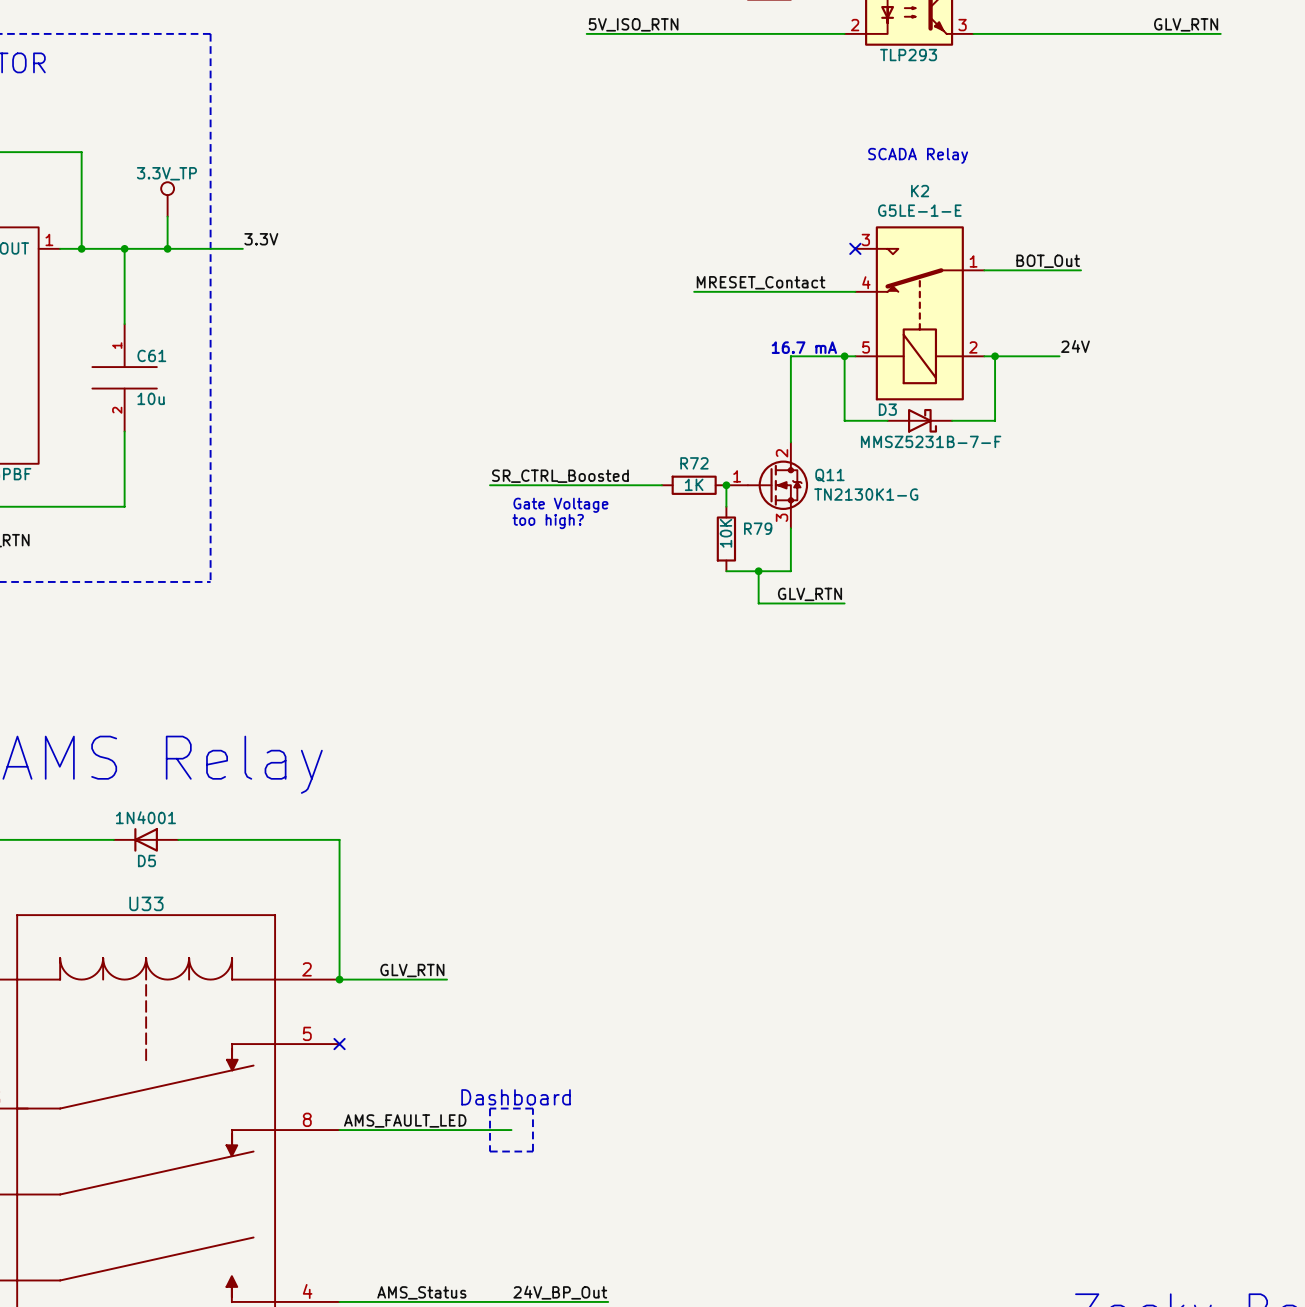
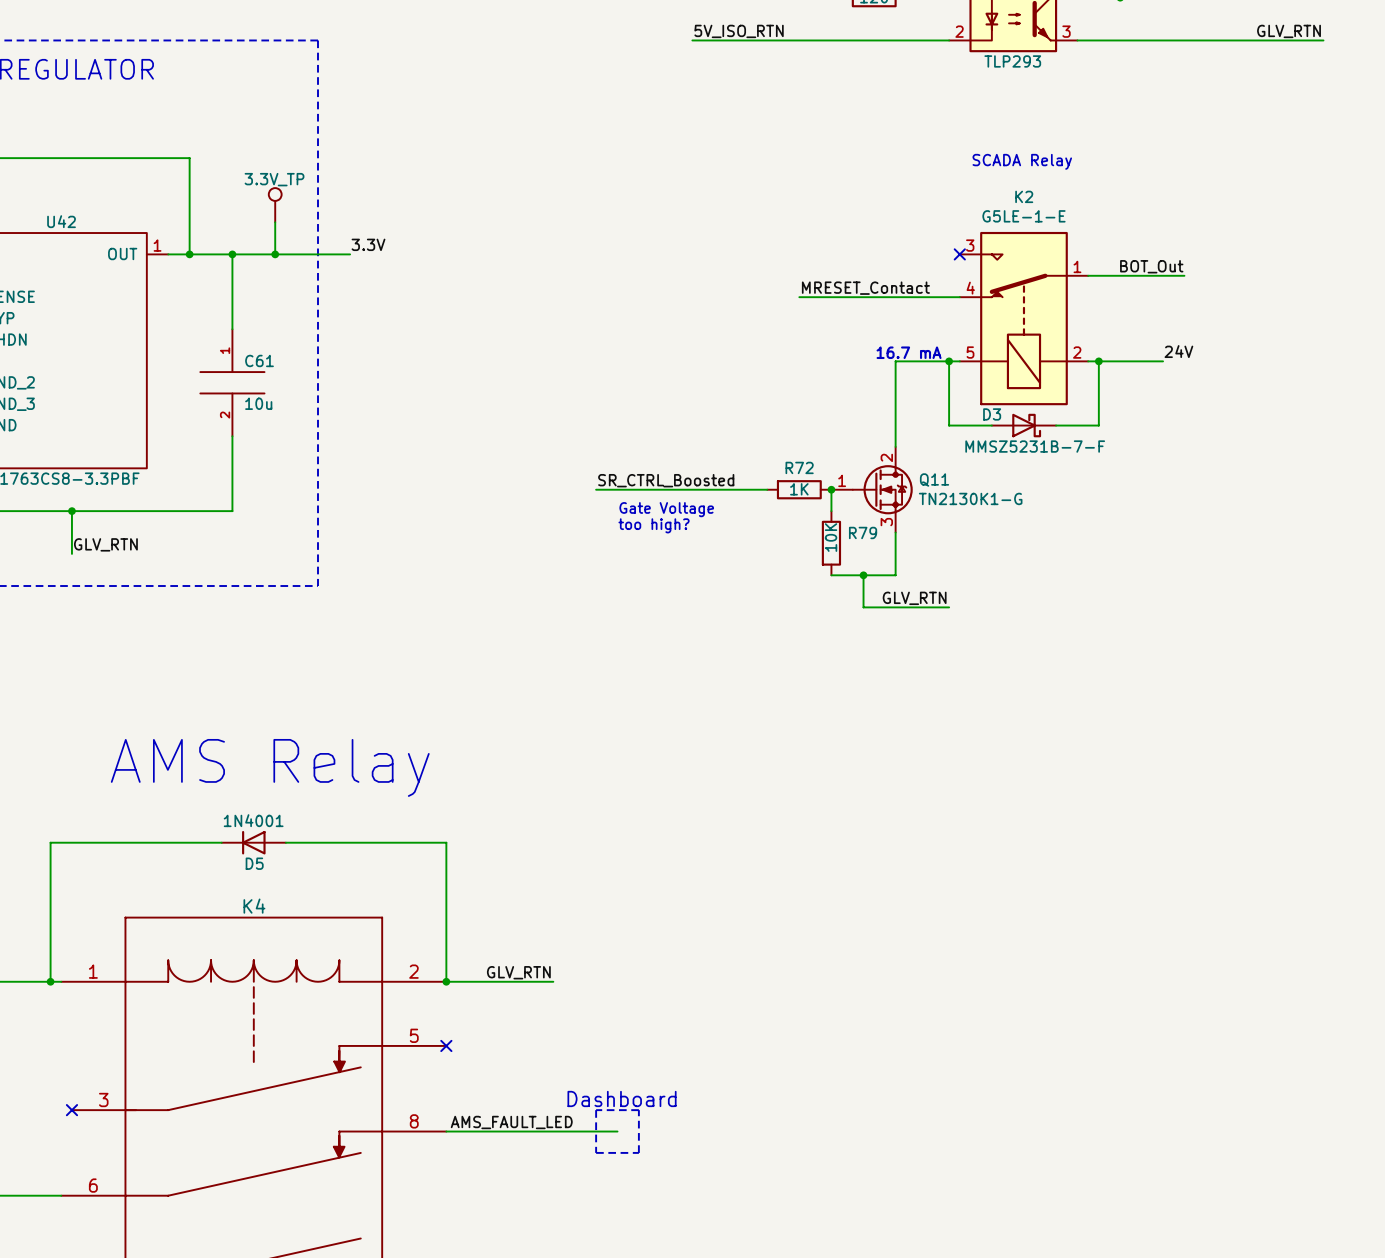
U33 name: U33 (146, 903) -> K4 (254, 906)

